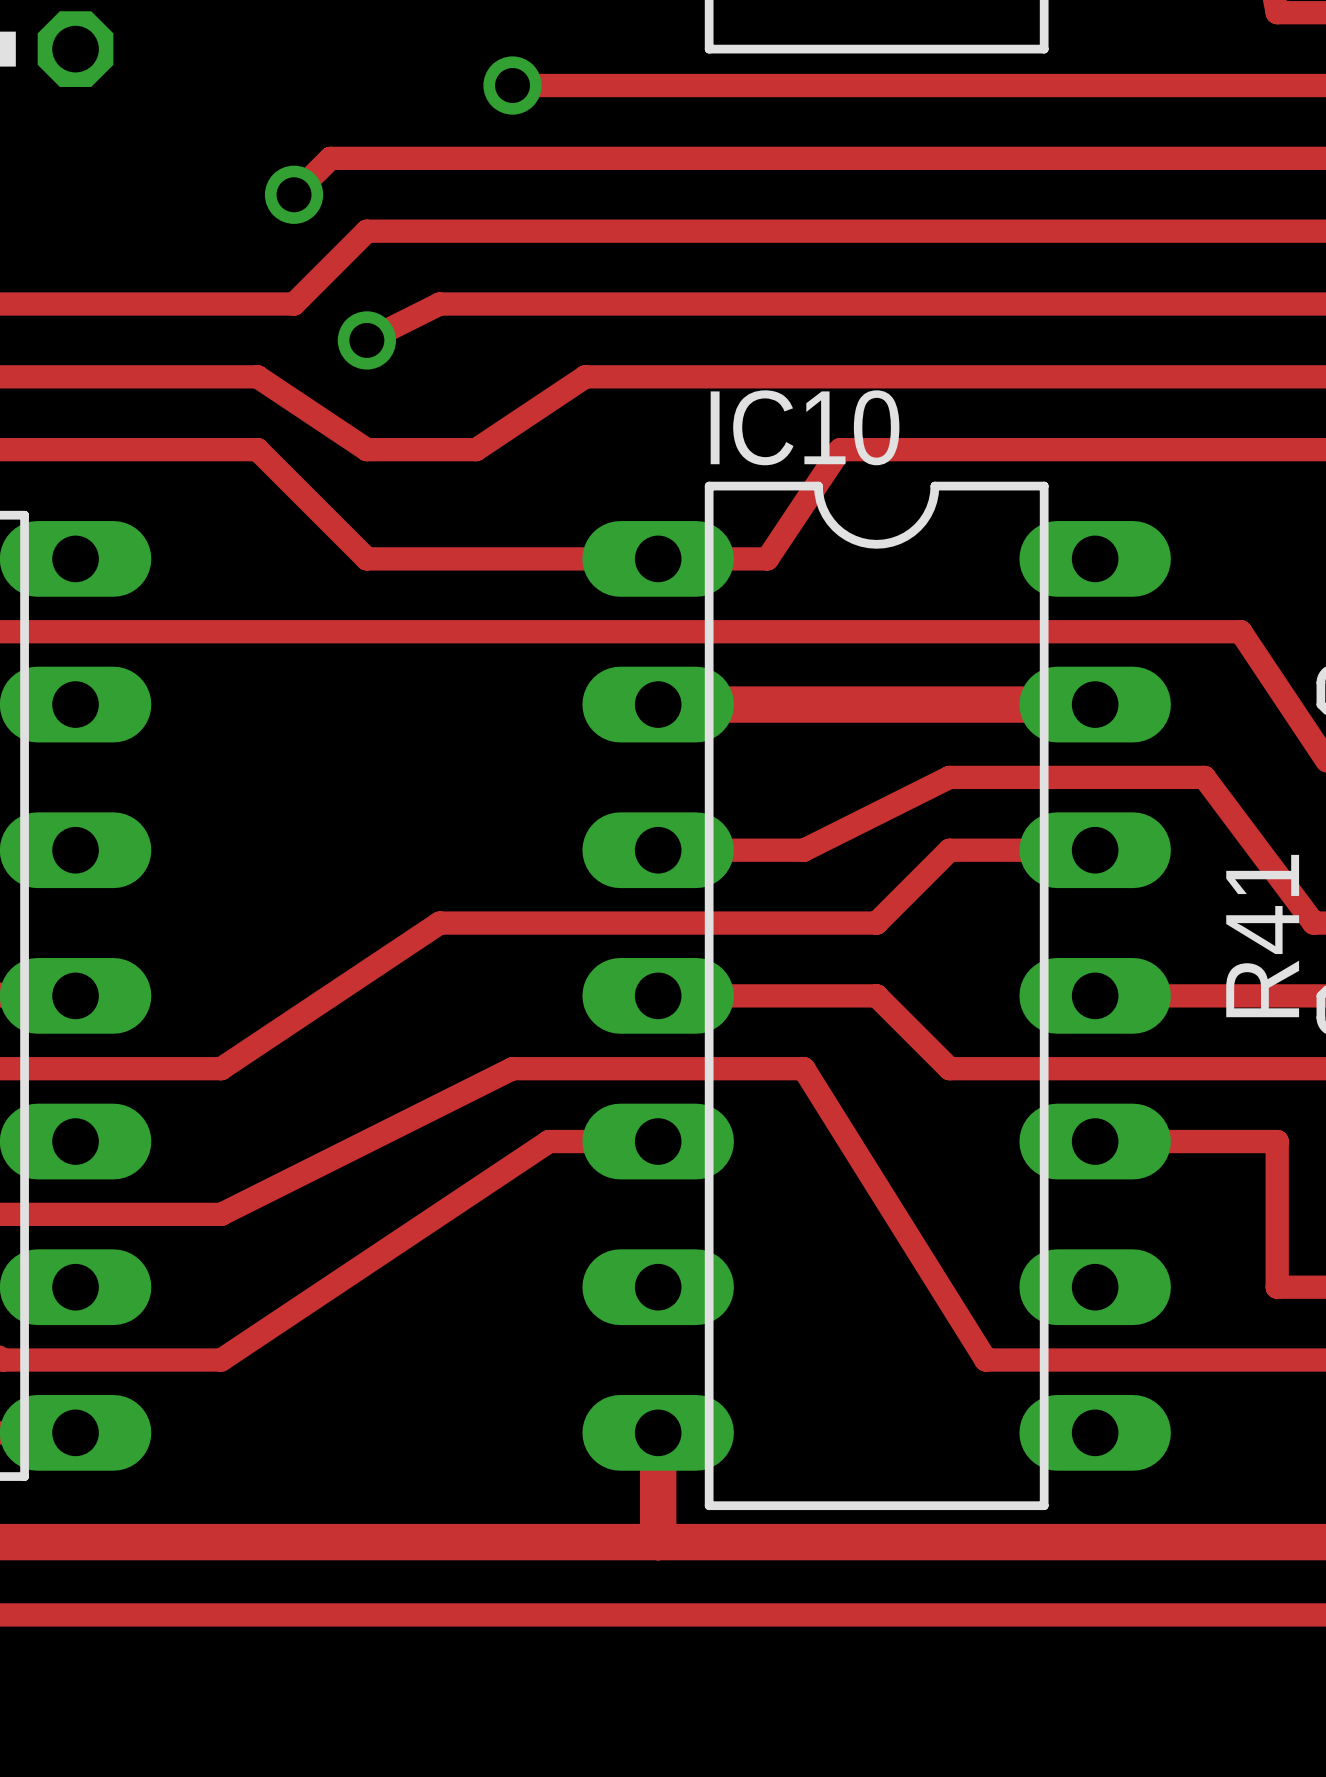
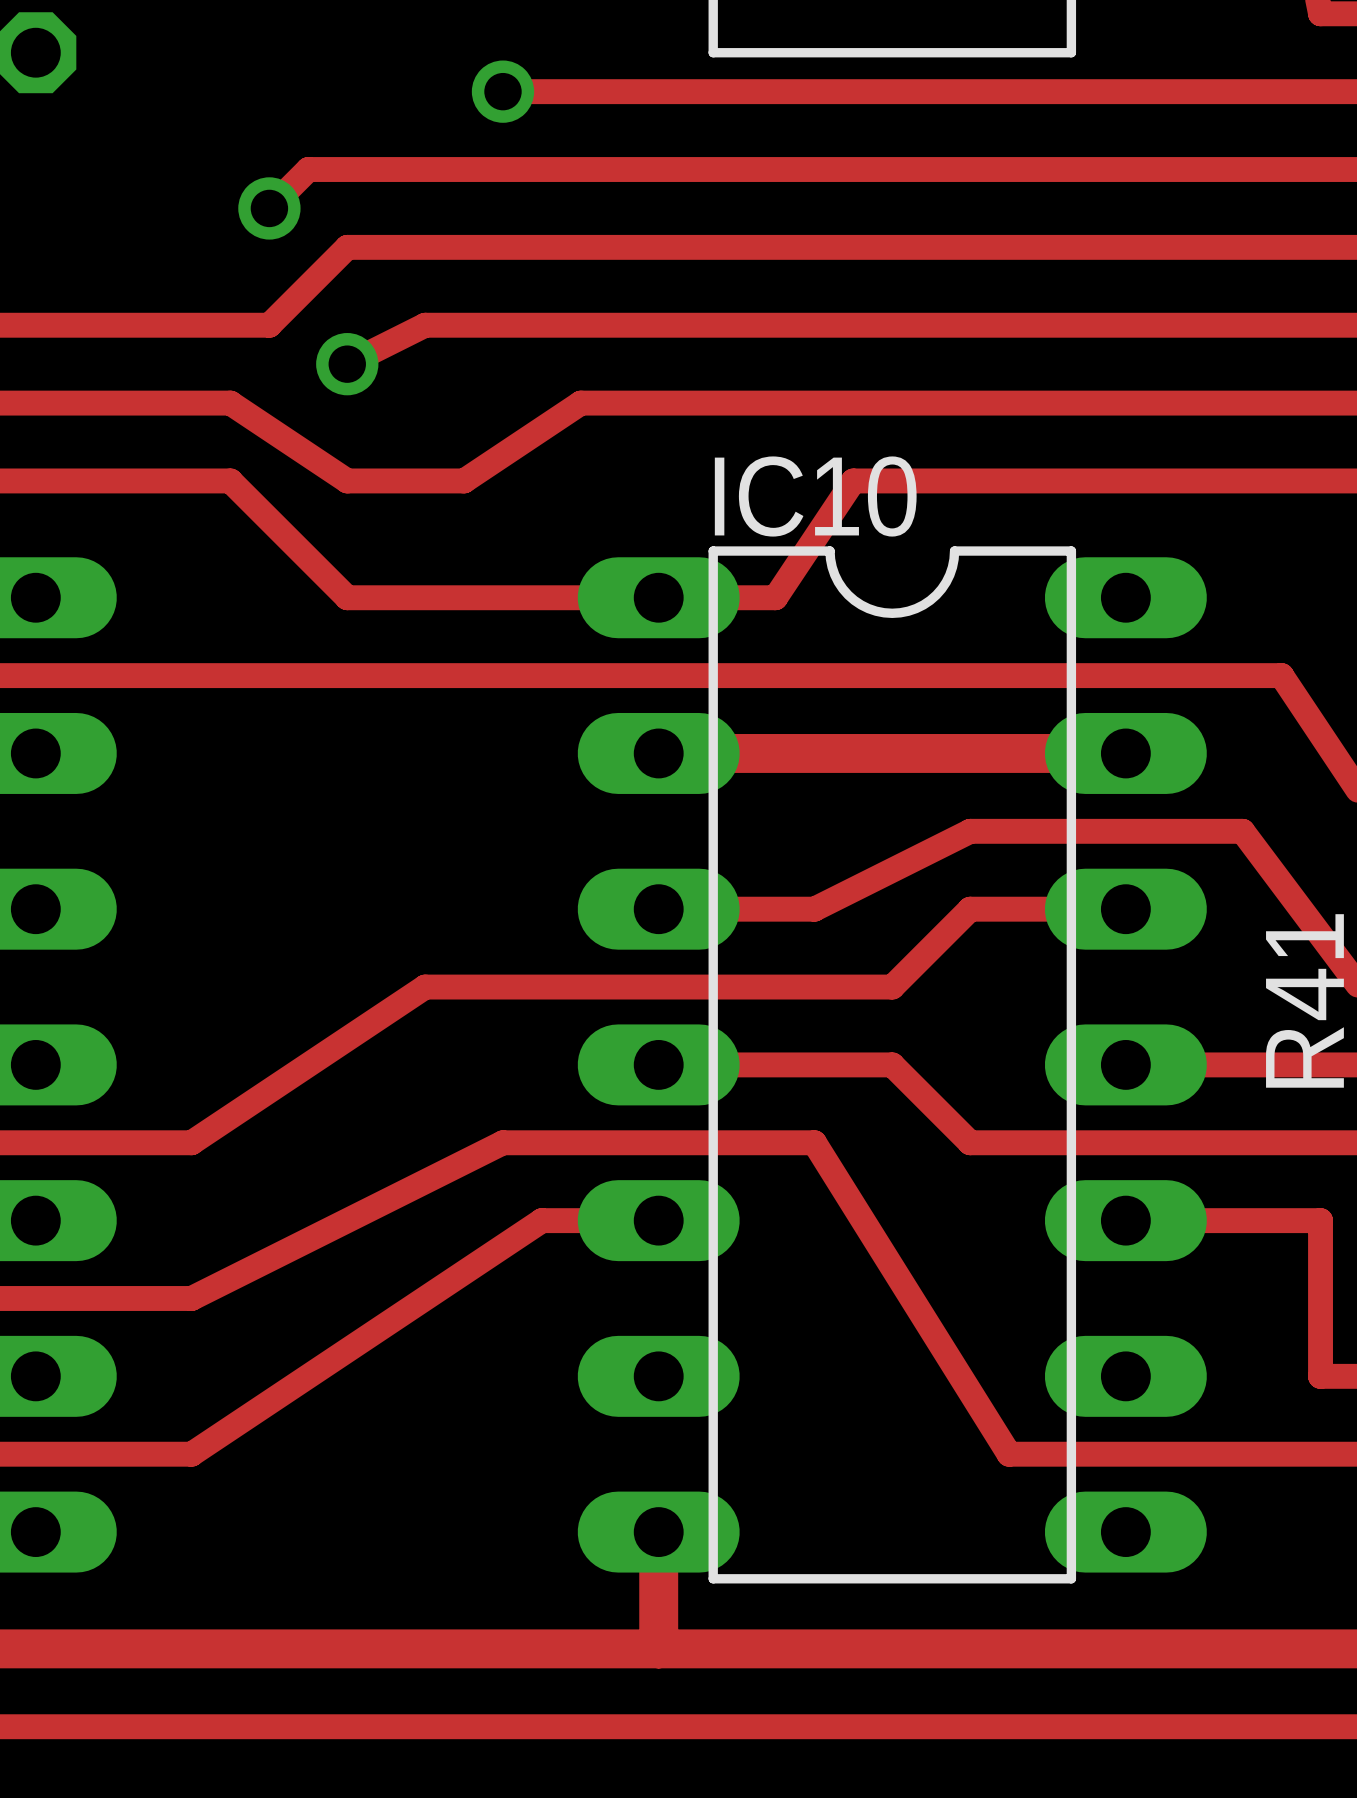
IC10 name position: IC10 (805, 427) -> IC10 (815, 496)
IC10 footprint: [582, 481, 1171, 1511] -> [577, 546, 1207, 1584]

